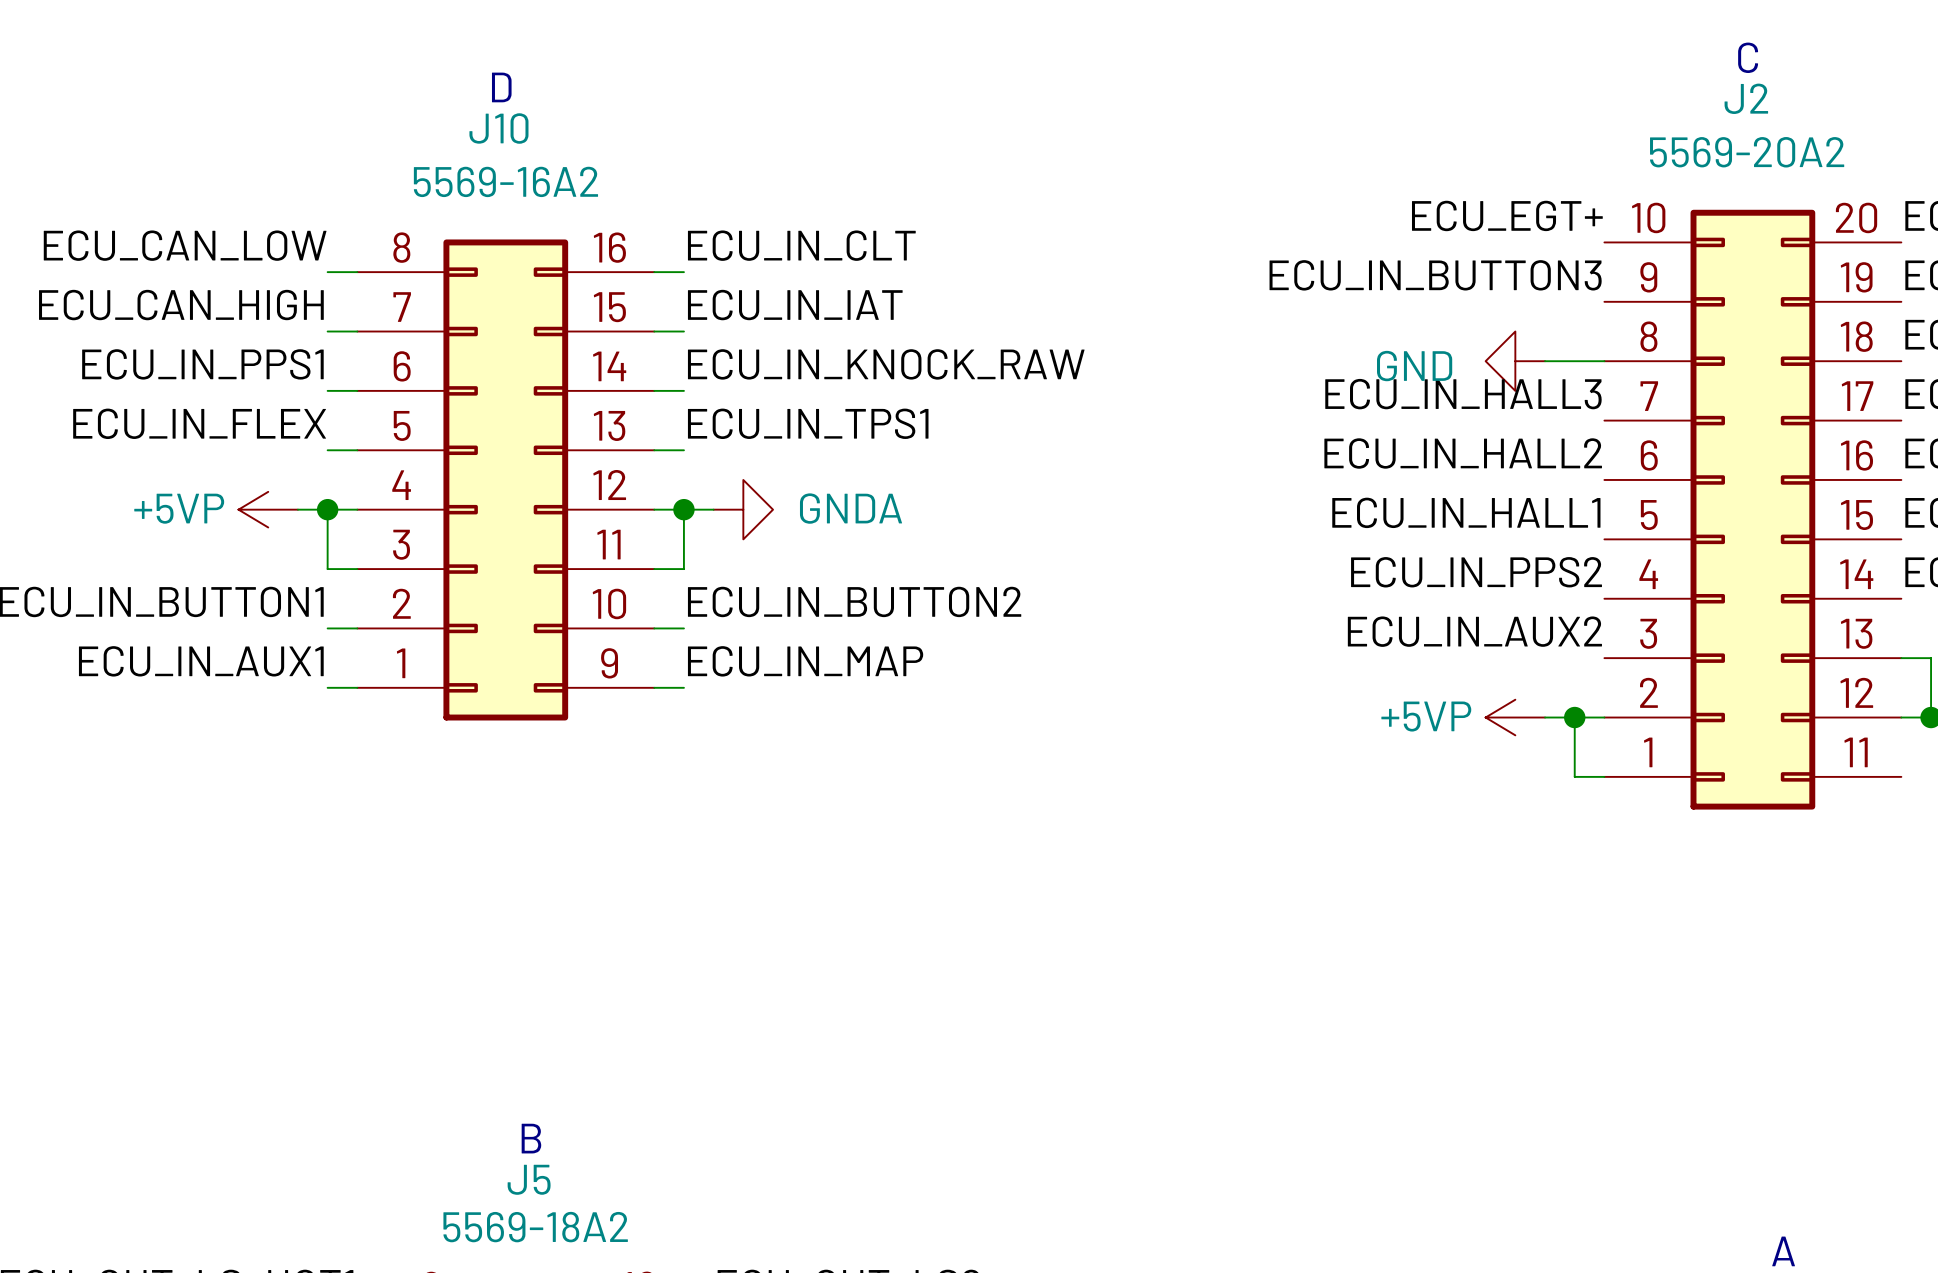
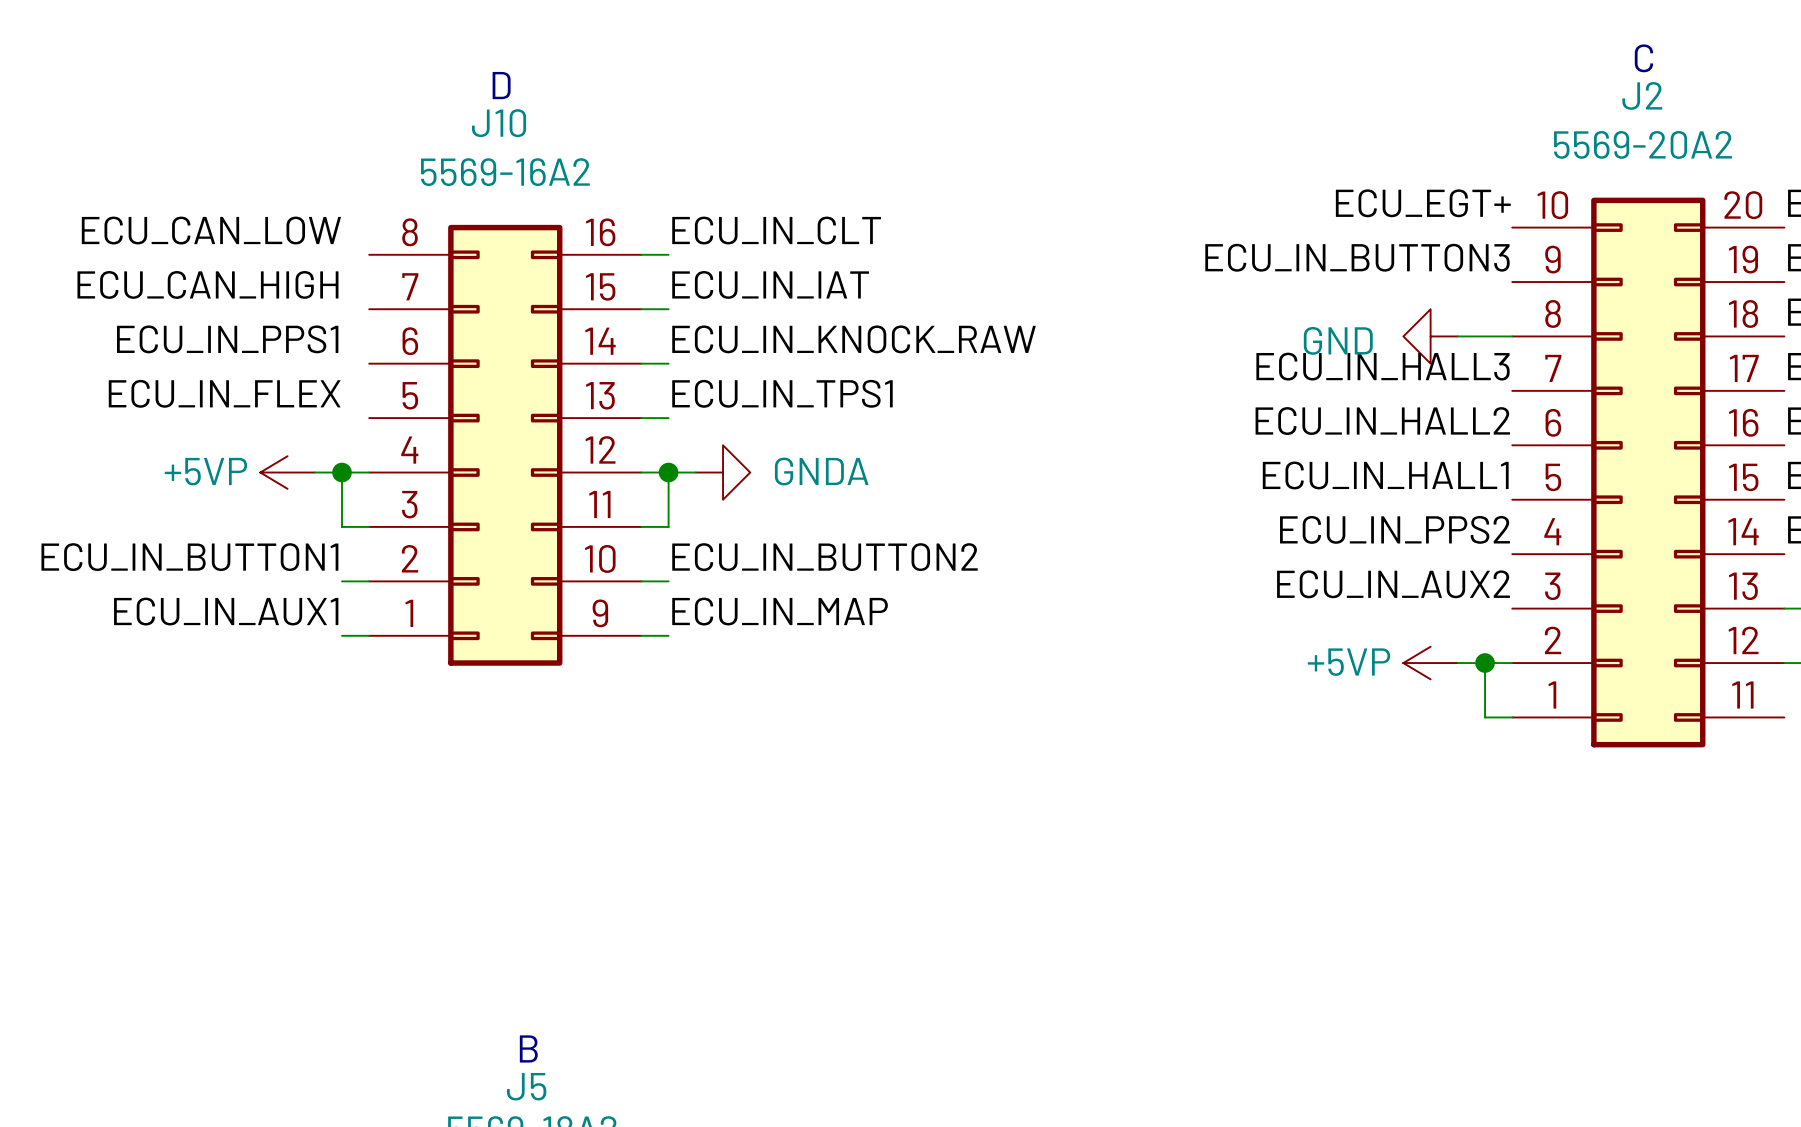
wire: (327, 272) (357, 272) -> none
wire: (327, 331) (357, 331) -> none
wire: (327, 390) (357, 390) -> none
wire: (327, 450) (357, 450) -> none

